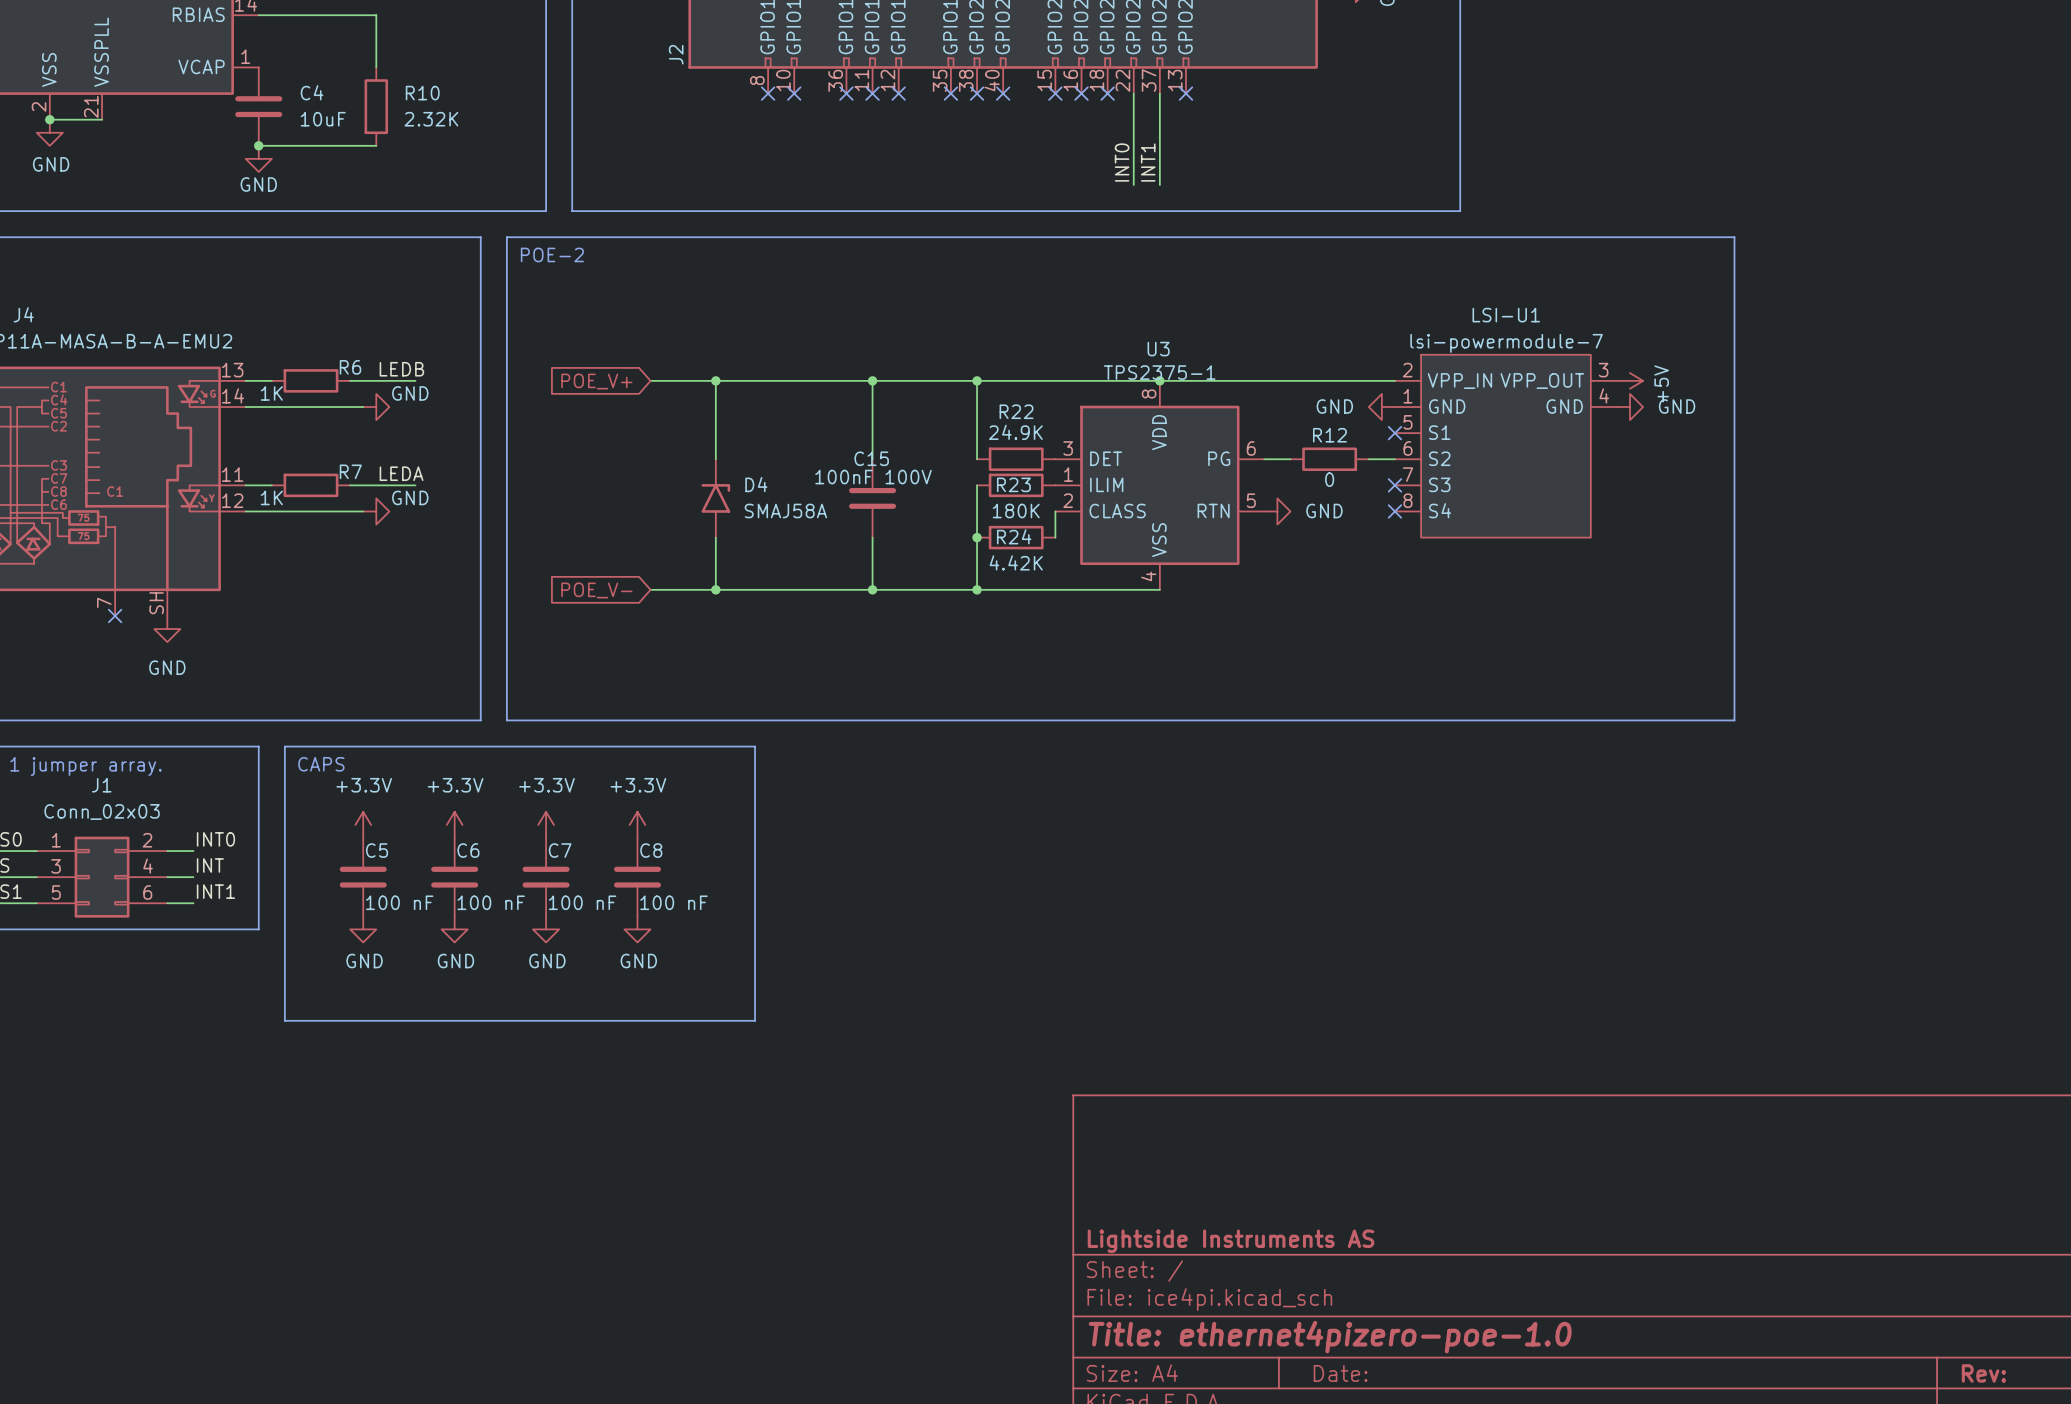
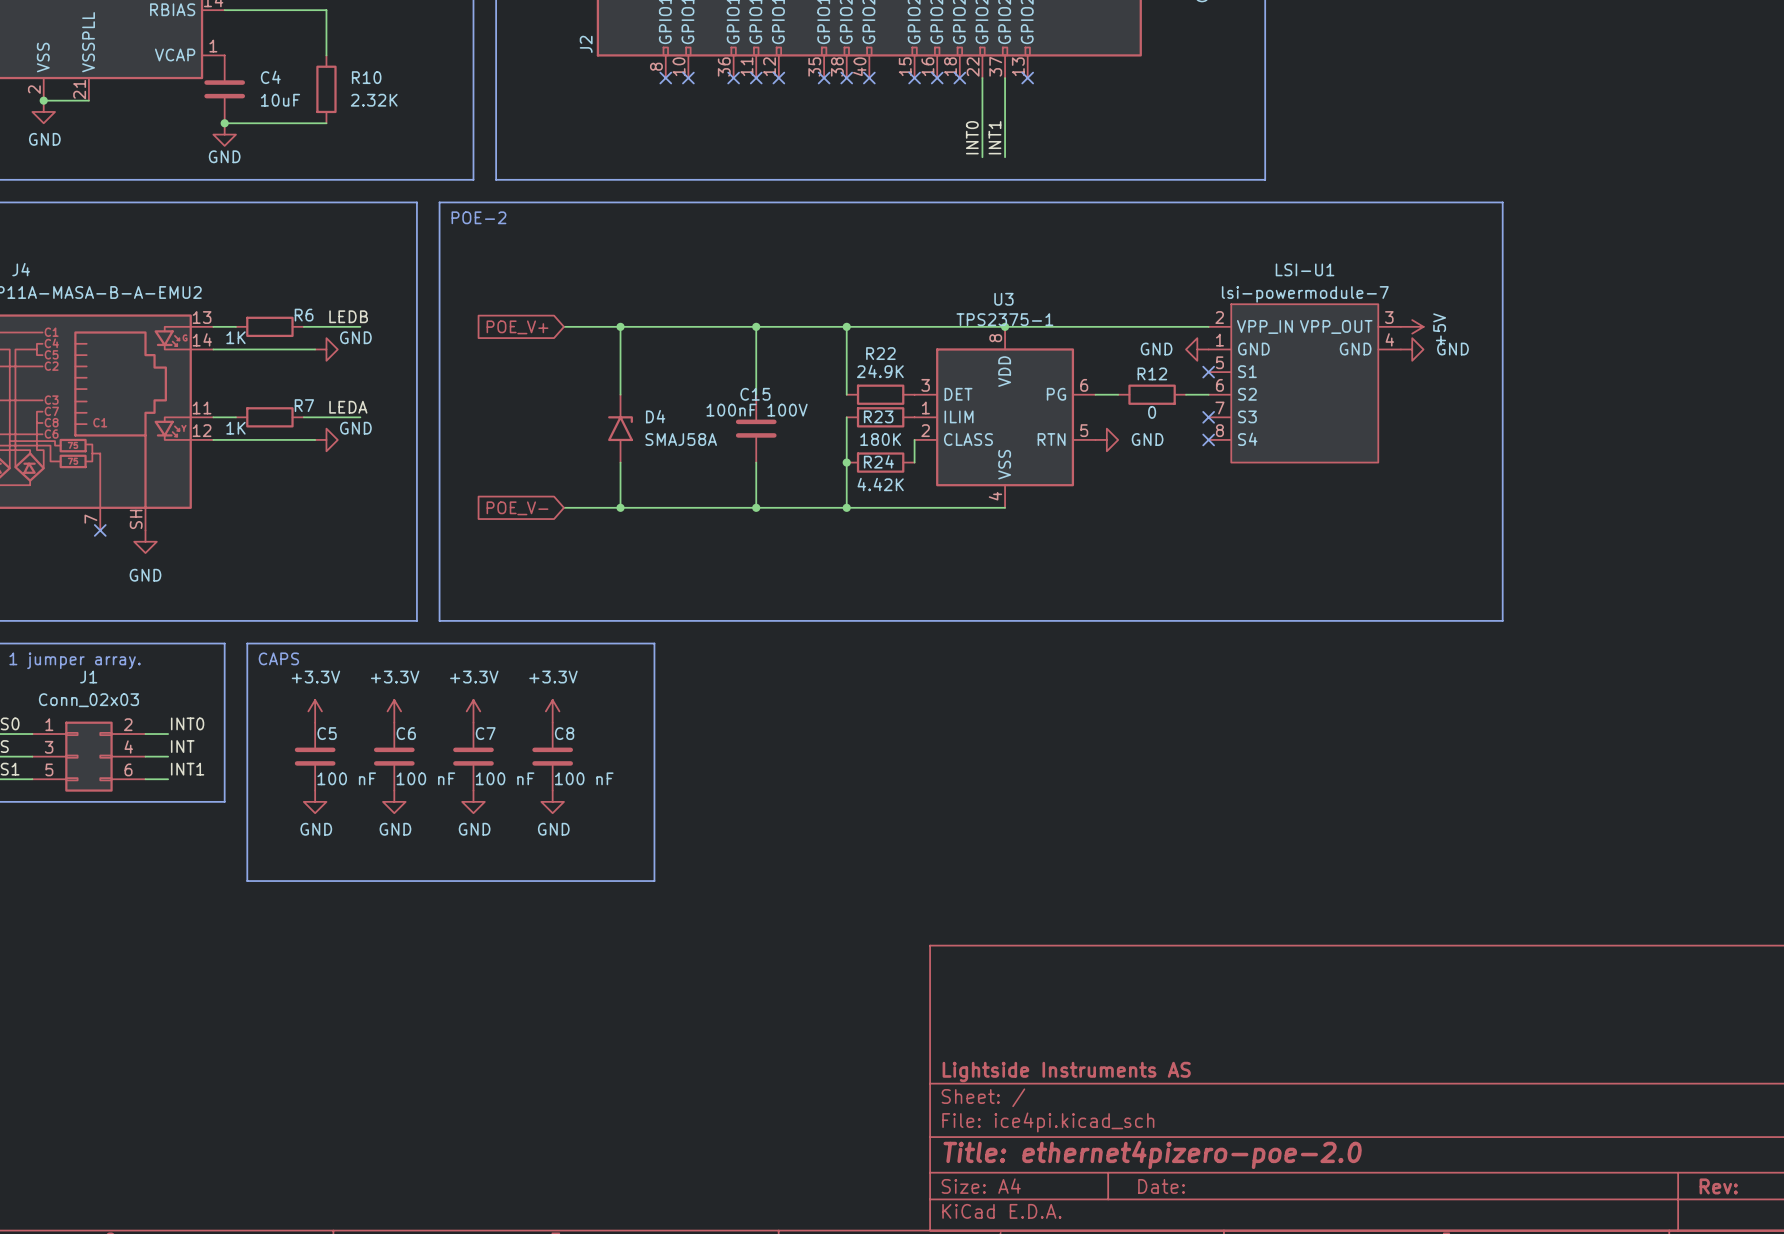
title block: Title: ethernet4pizero-poe-1.0 (1330, 1337) -> Title: ethernet4pizero-poe-2.0 (1152, 1154)

